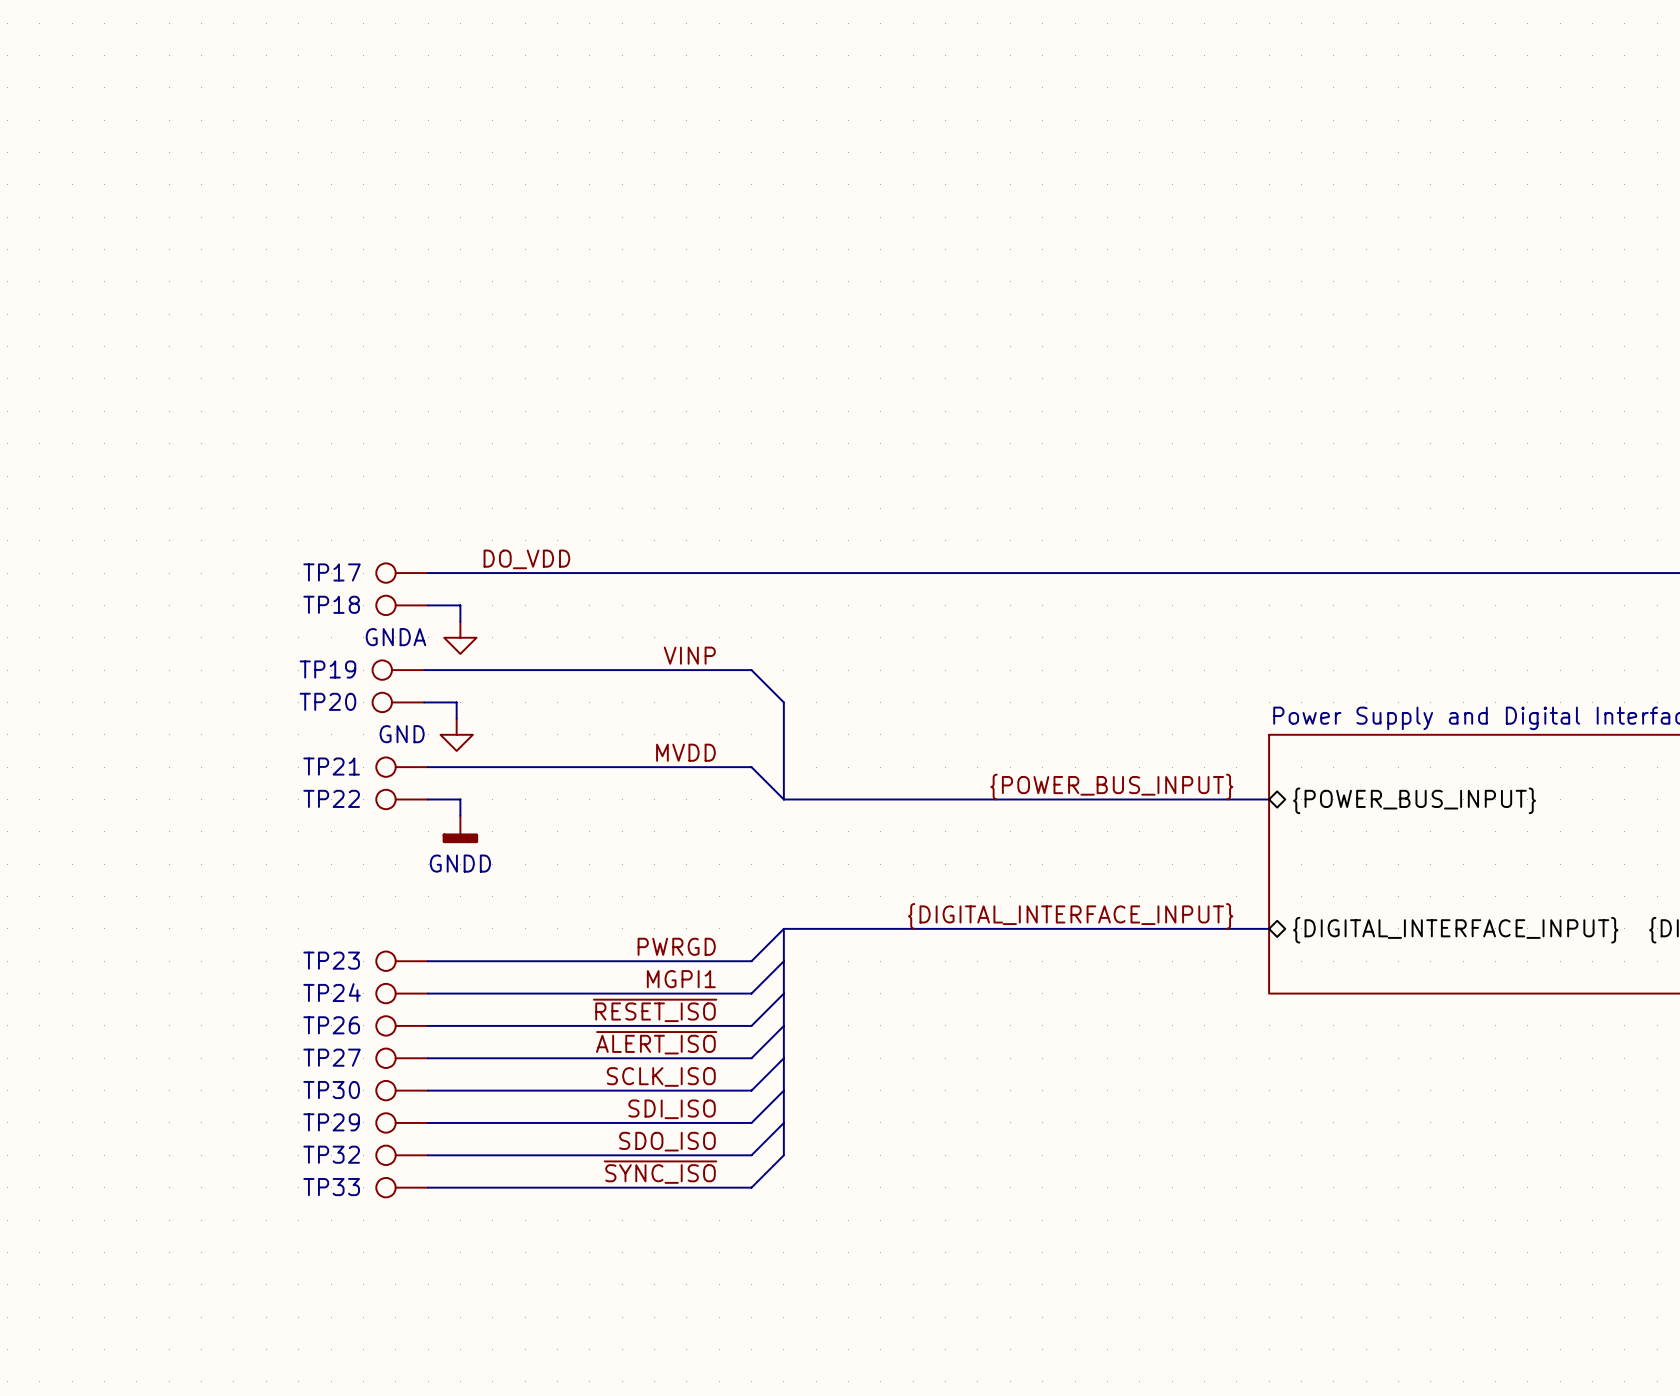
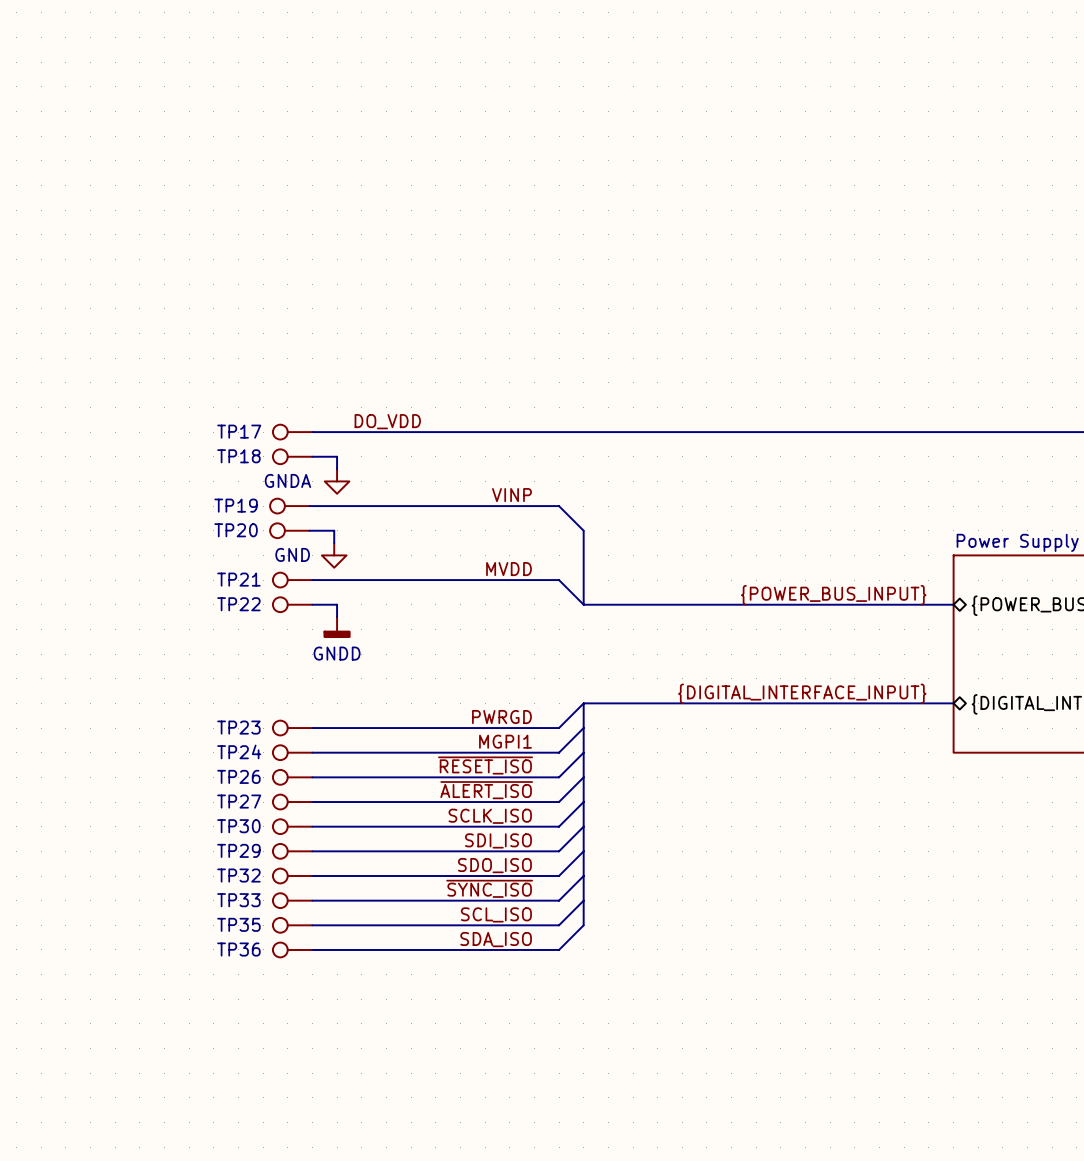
bus: none -> (583, 876) (583, 925)
wire: none -> (583, 900) (559, 925) (312, 925)
label: none -> SCL_ISO (496, 914)
TP35: none -> (292, 925)
wire: none -> (583, 925) (559, 949) (312, 949)
label: none -> SDA_ISO (496, 939)
TP36: none -> (292, 949)

